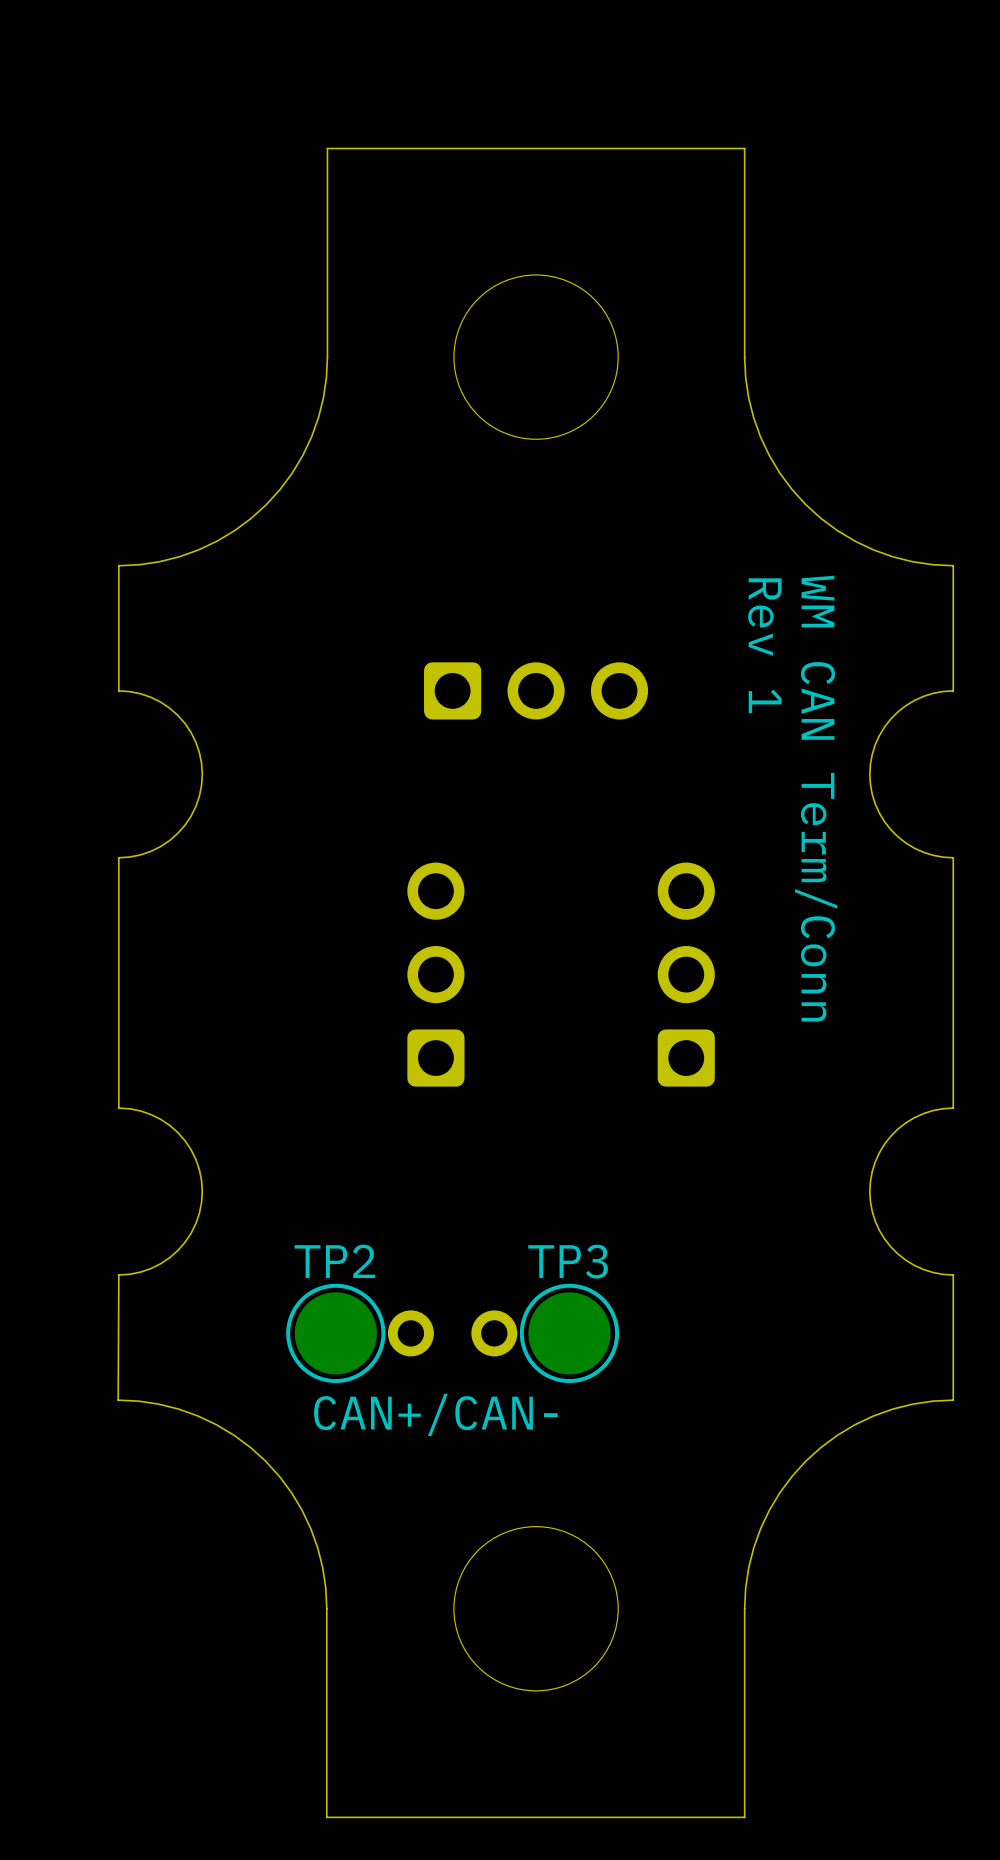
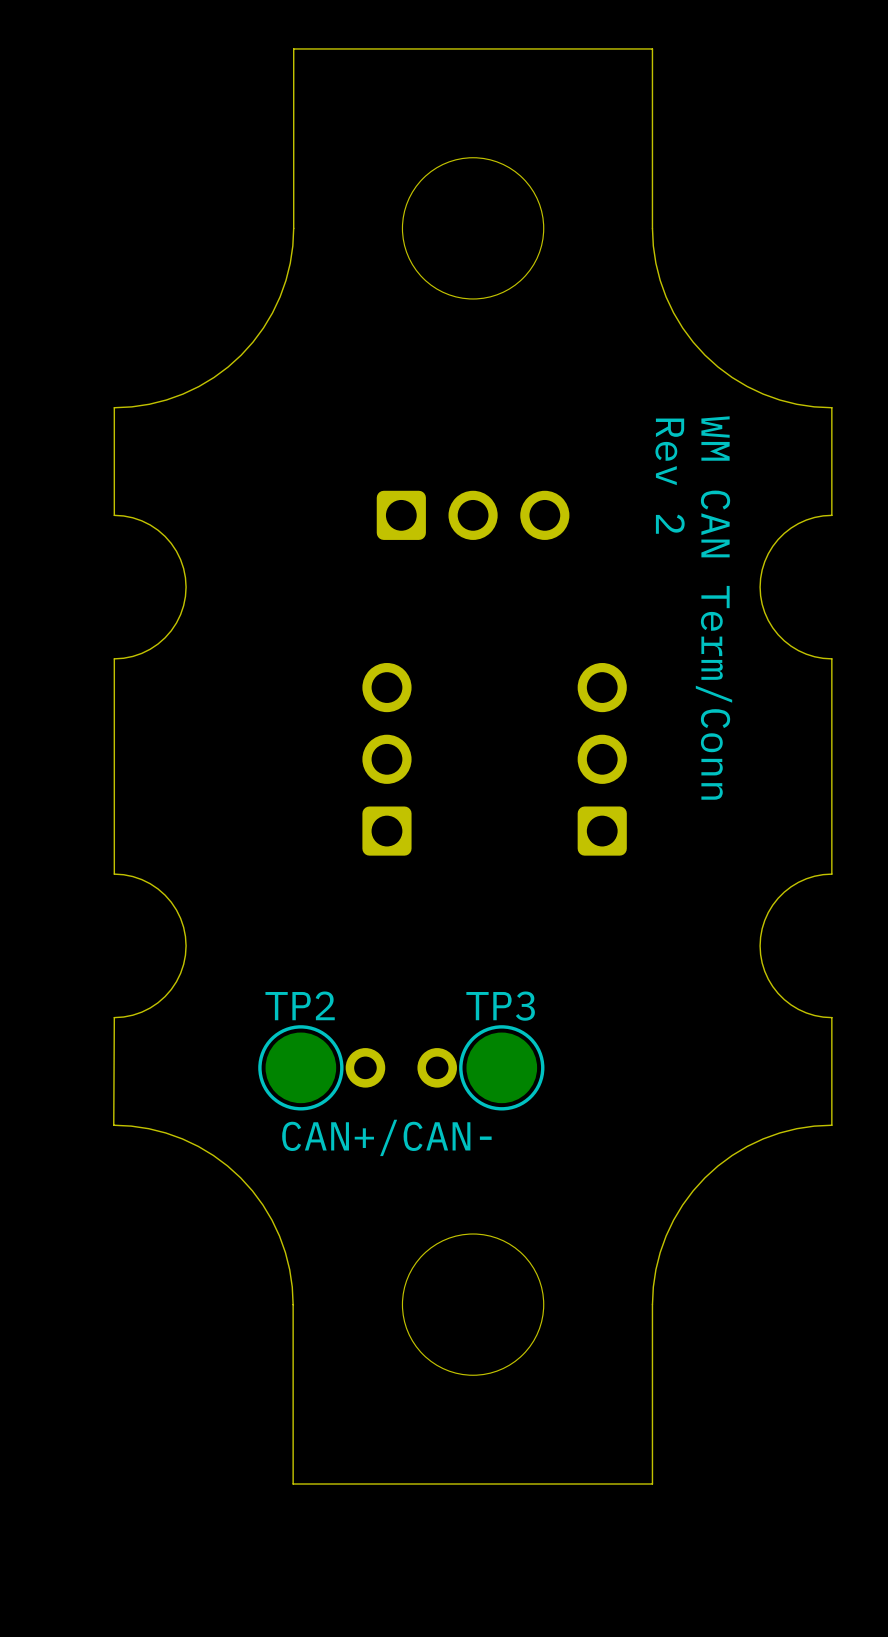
text: Rev 1 (764, 645) -> Rev 2 (670, 476)

